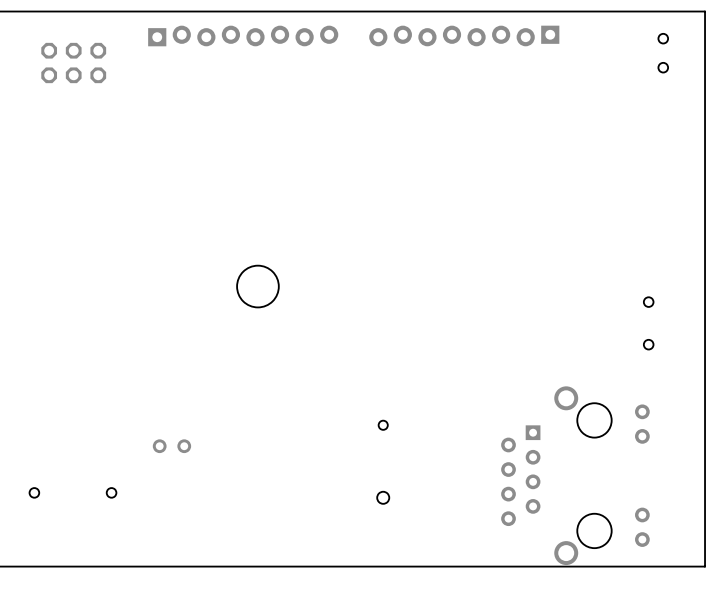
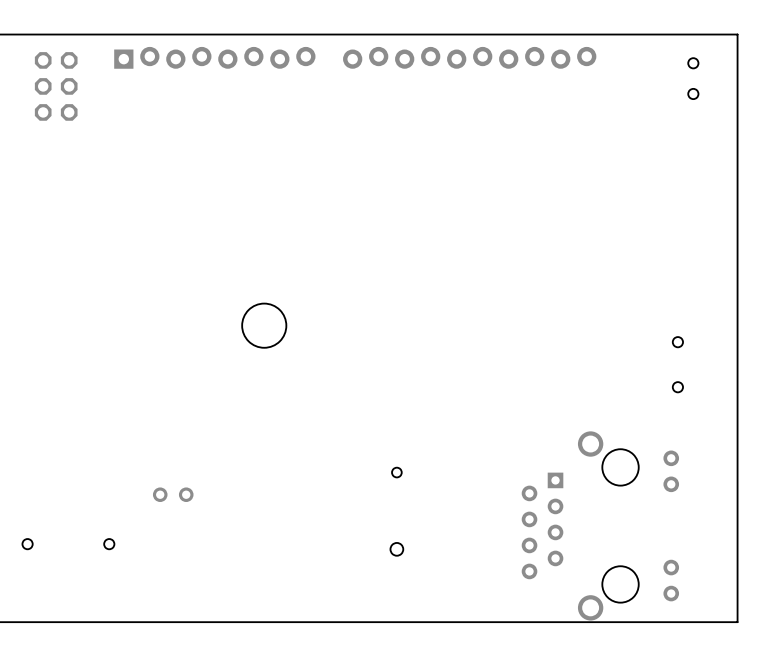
part: none -> (469, 57)
part position: (243, 35) -> (214, 57)
part: (464, 35) -> none
part rotation: 0° (73, 63) -> 90° clockwise (56, 86)

